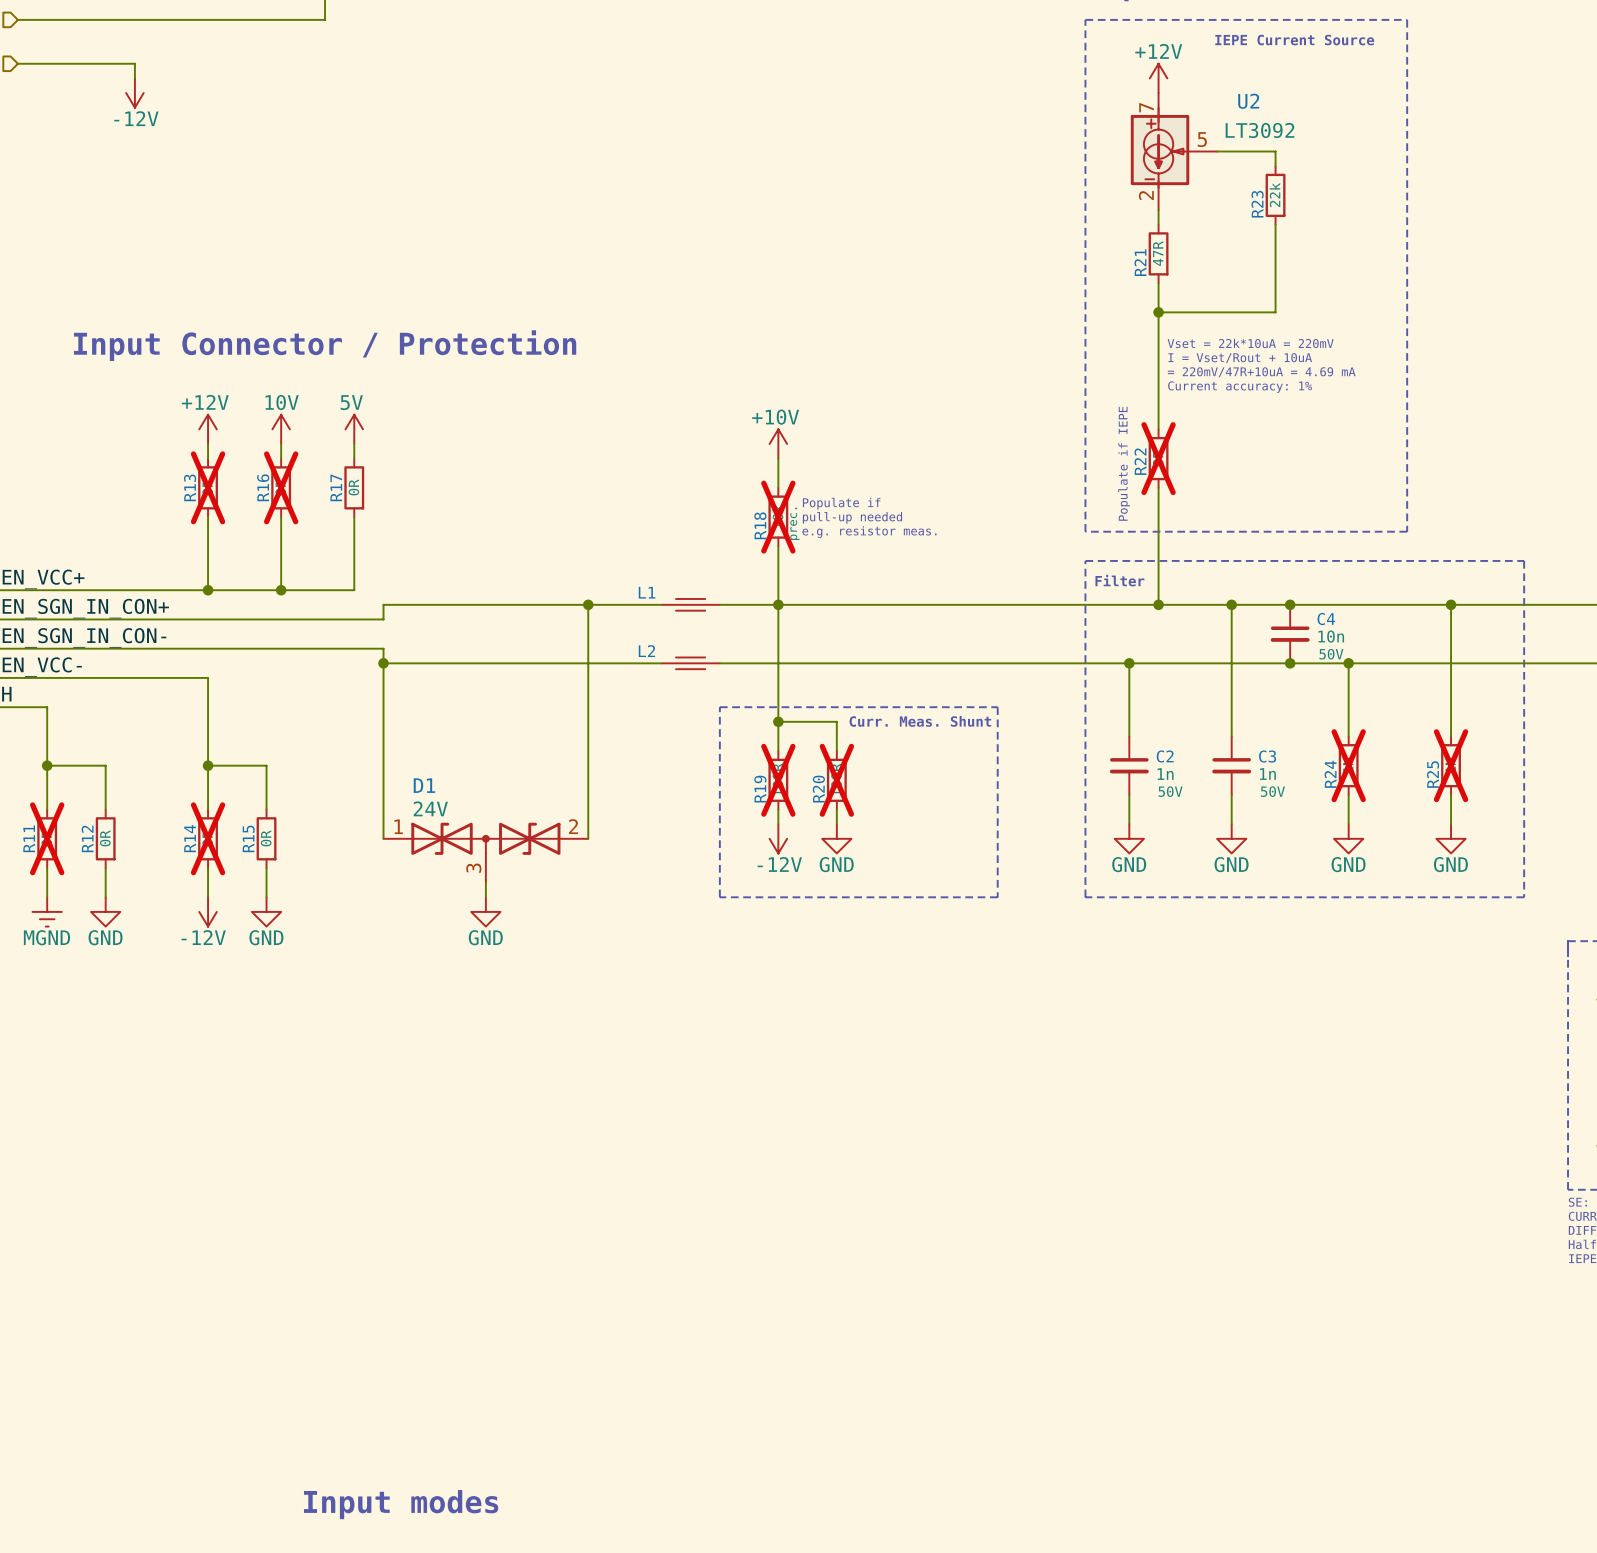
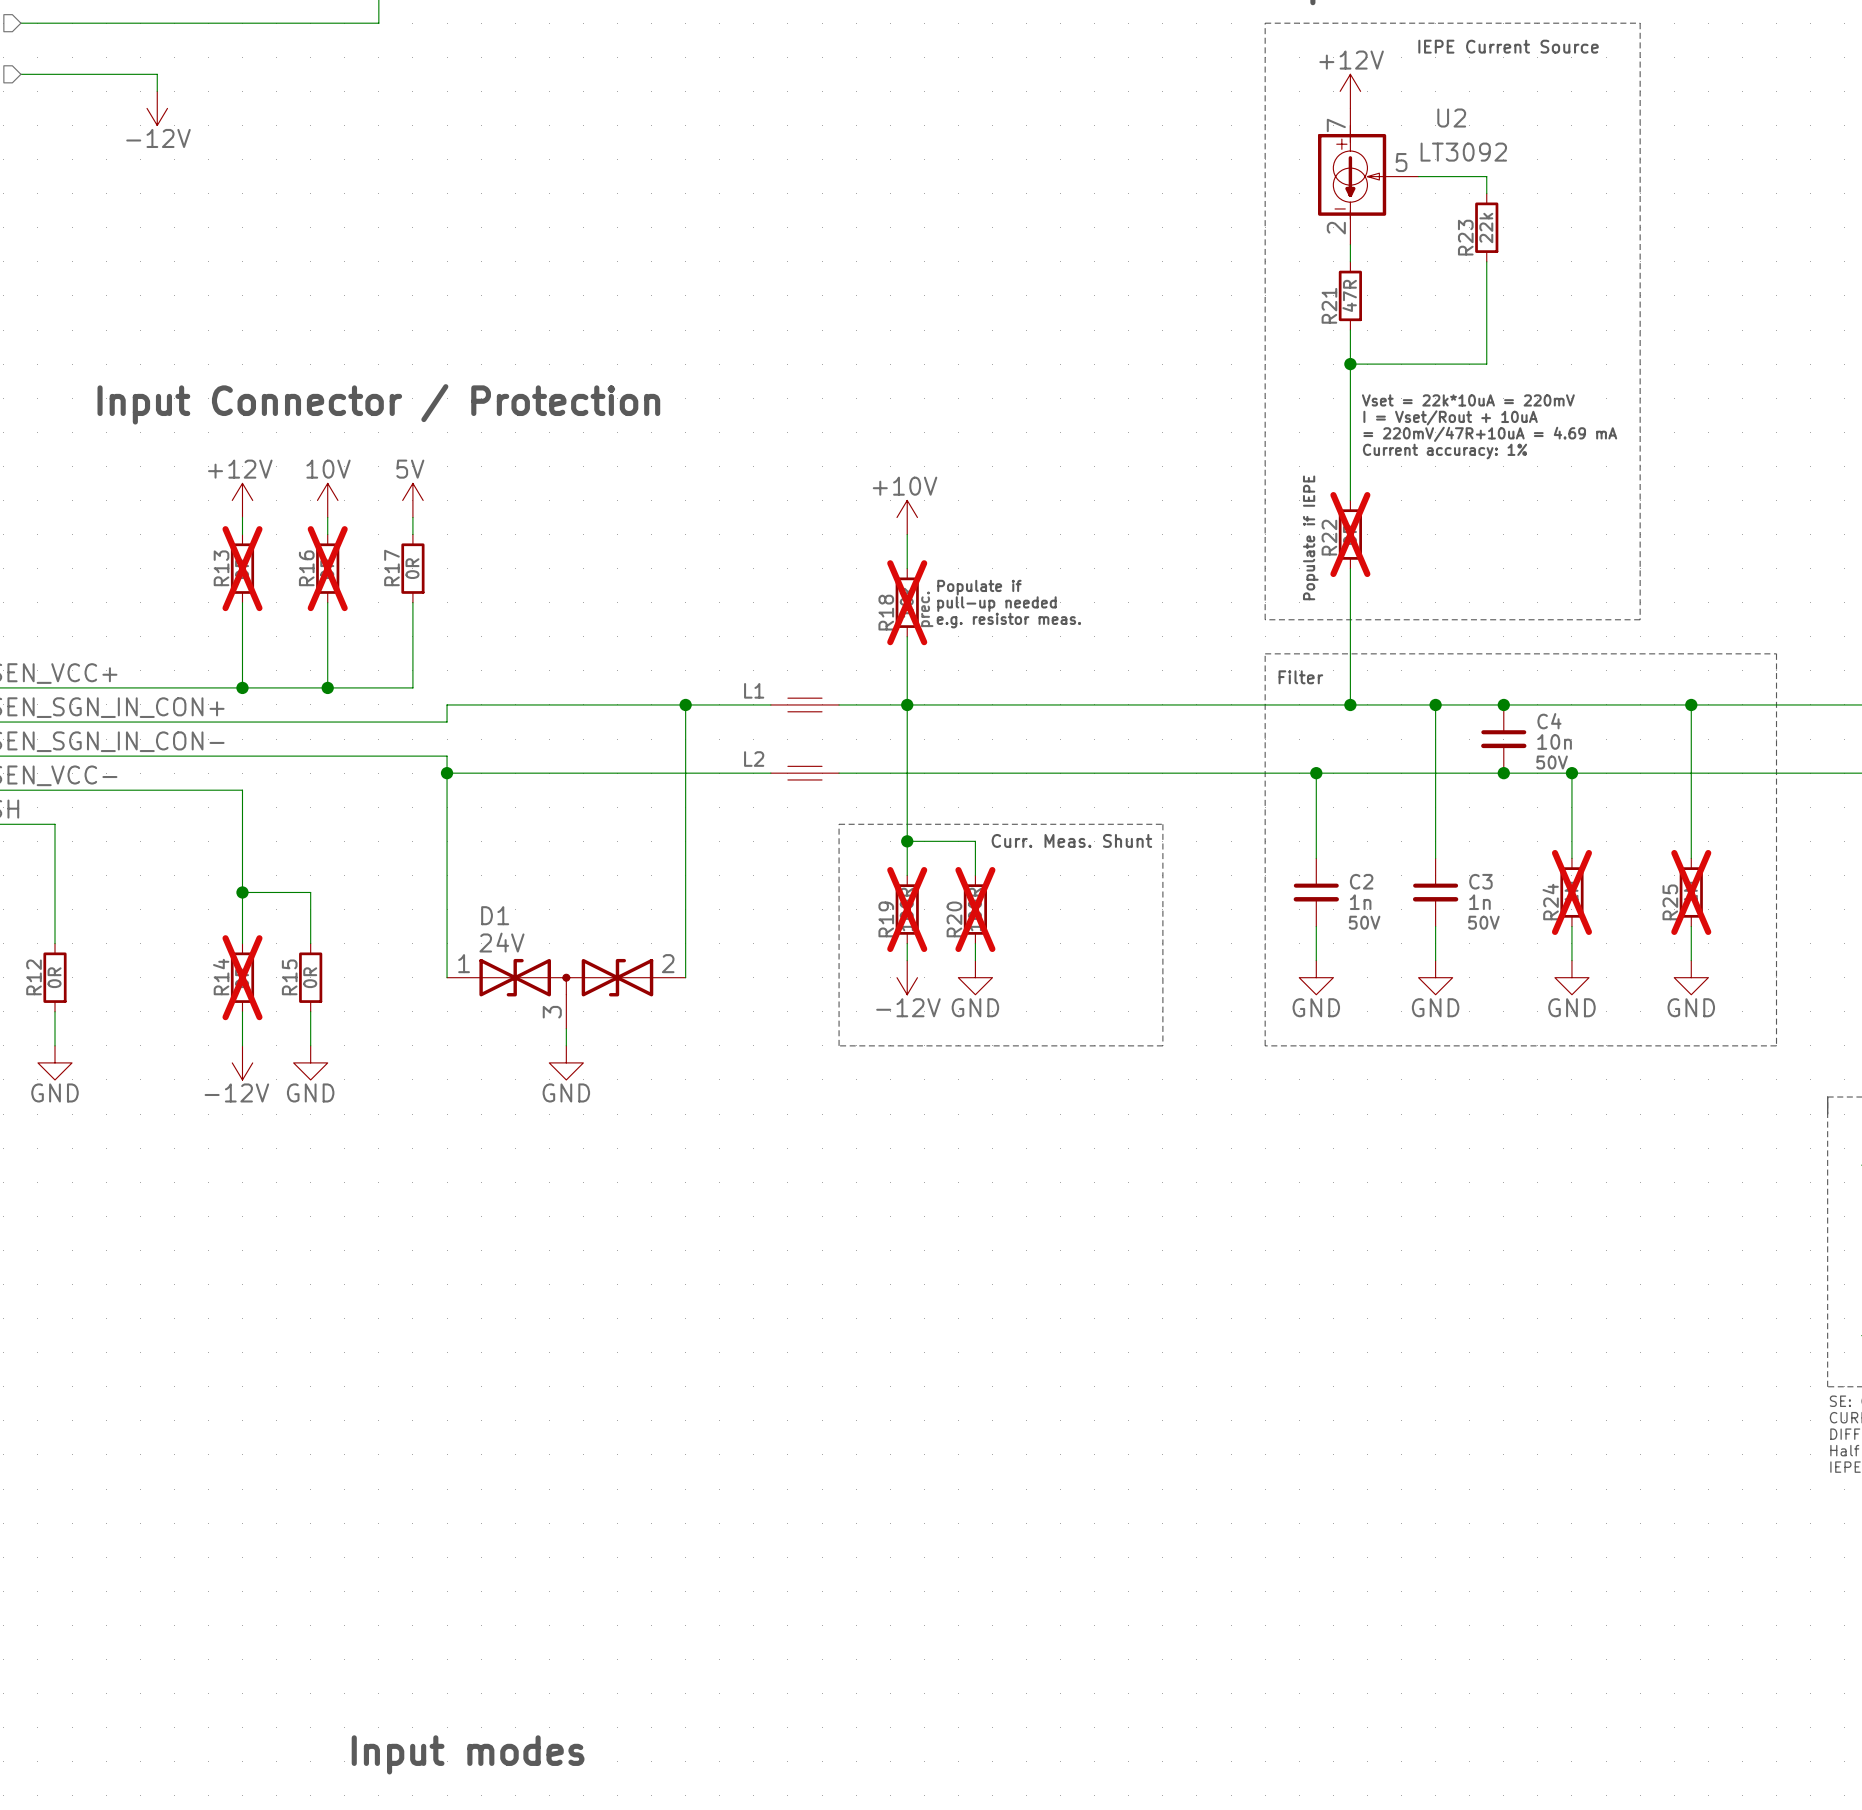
wire: (47, 765) (105, 765) (105, 809) -> none
junction: (47, 765) -> none
R11 name: R11 (29, 838) -> R12 (34, 977)
R11 do-not-place cross: (47, 838) -> none
R12: 0R (105, 838) -> none
wire: (105, 868) (105, 897) -> none
power symbol: MGND (47, 911) -> GND (55, 1062)
power symbol: GND (105, 911) -> none

